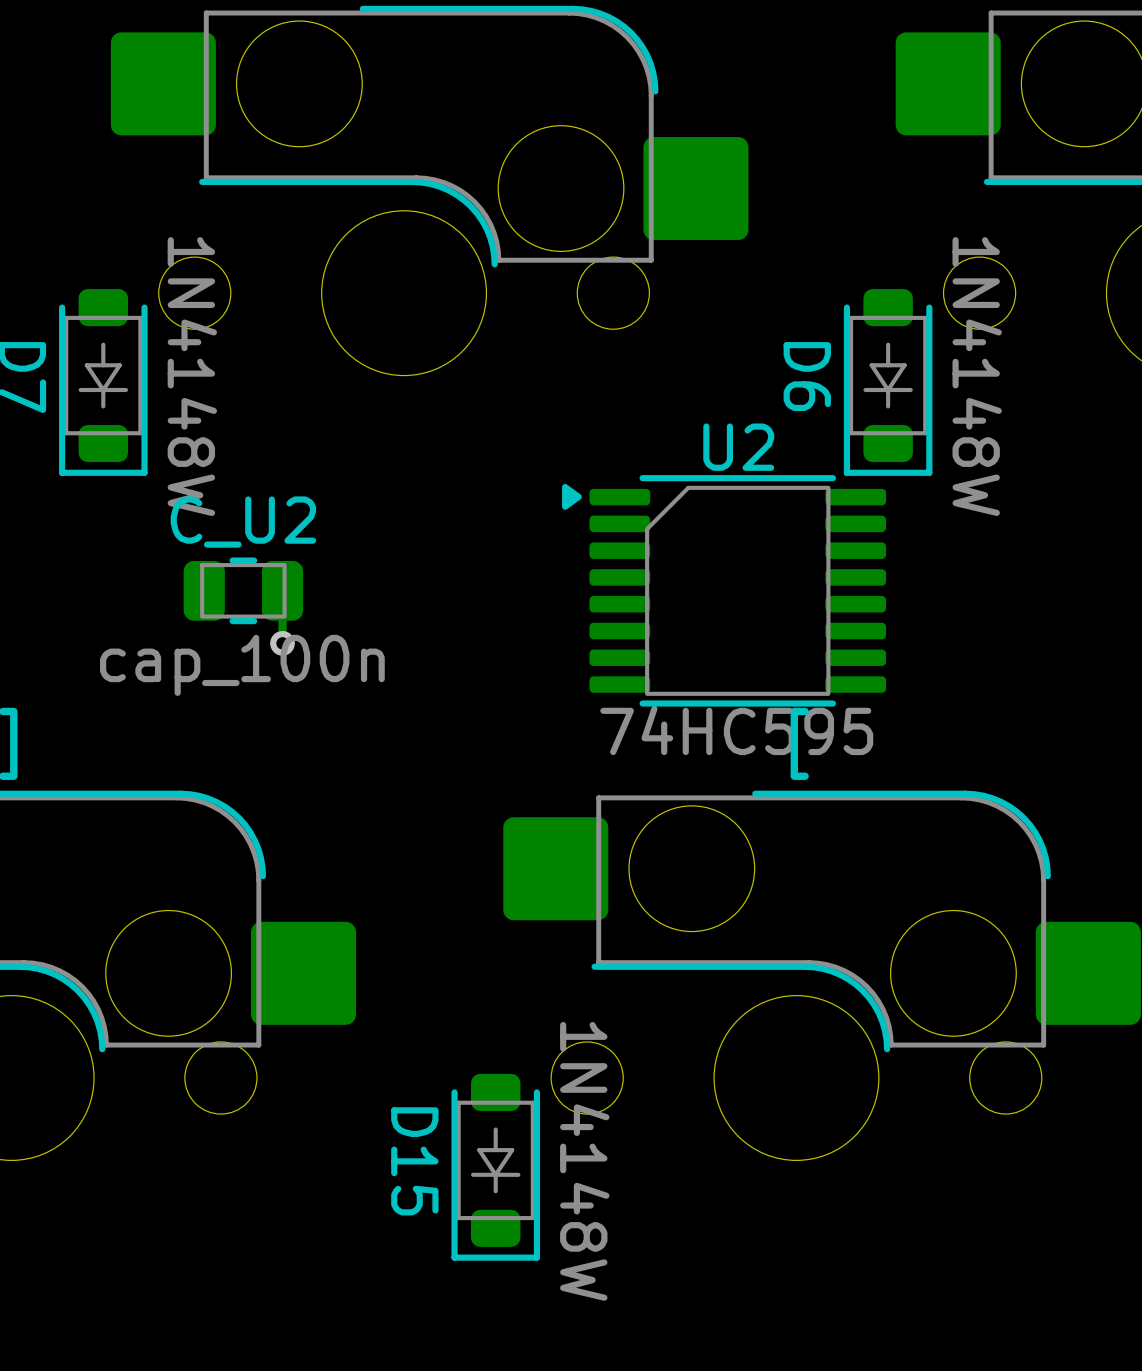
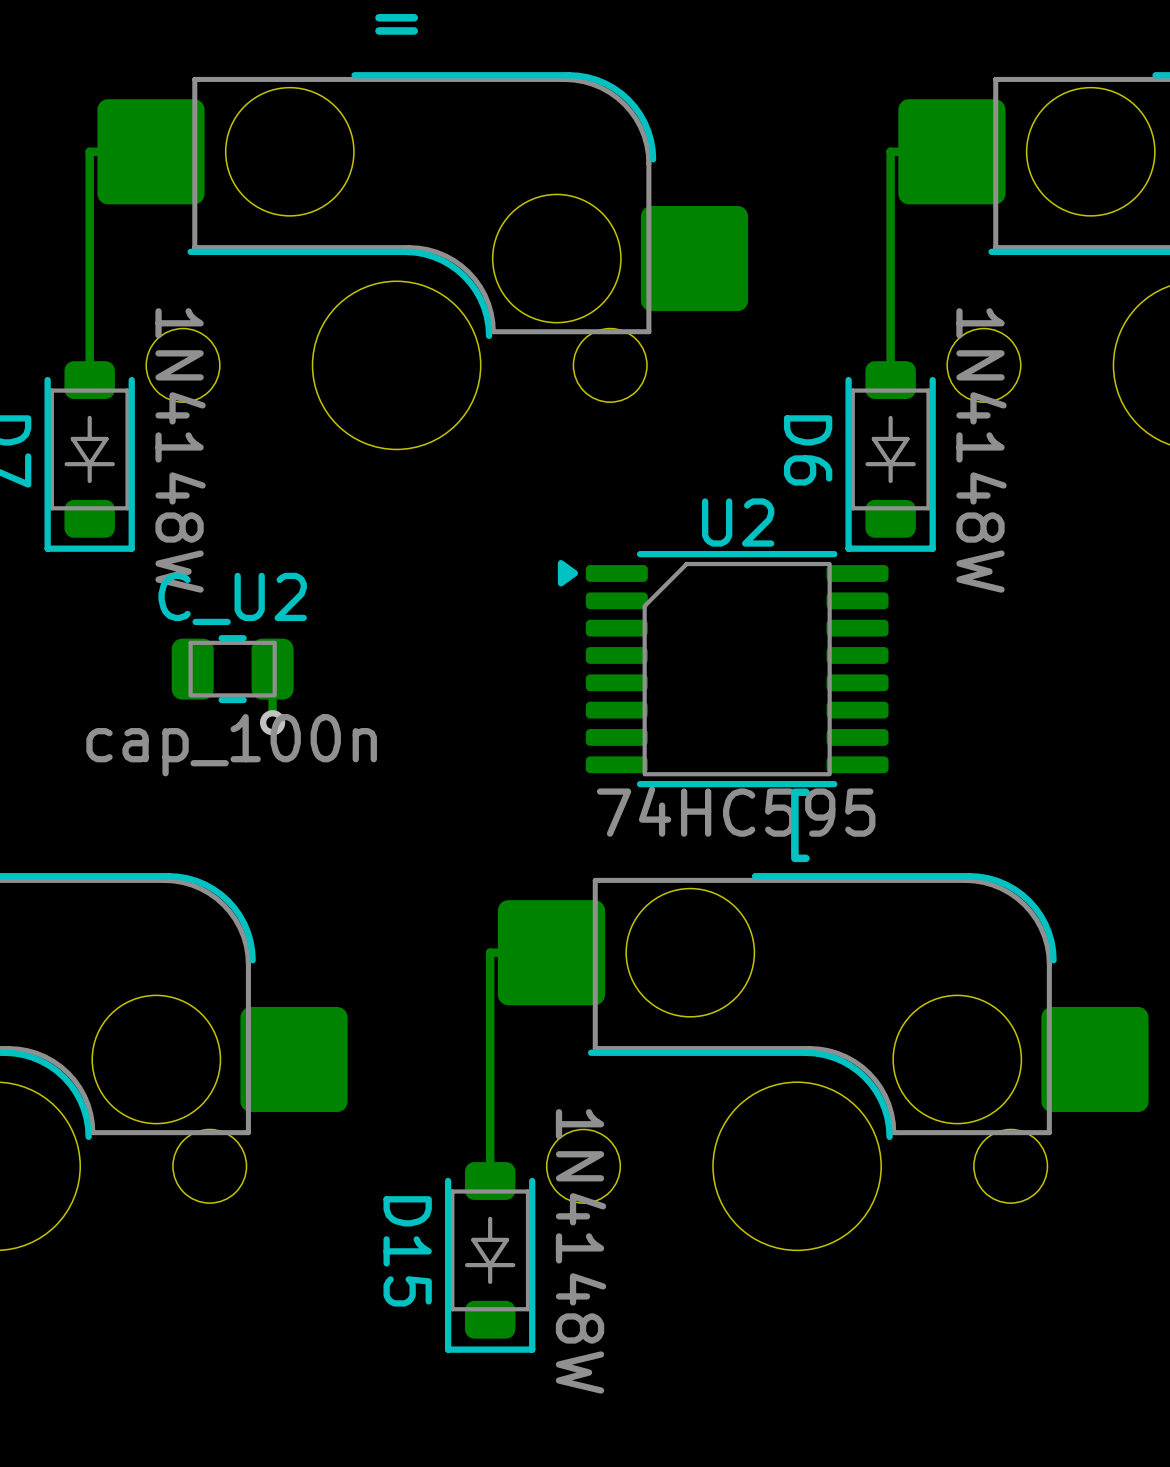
bottom track: none -> (150, 151) (89, 151) (89, 380)
bottom track: none -> (951, 151) (890, 151) (890, 380)
bottom track: none -> (551, 952) (490, 952) (490, 1181)

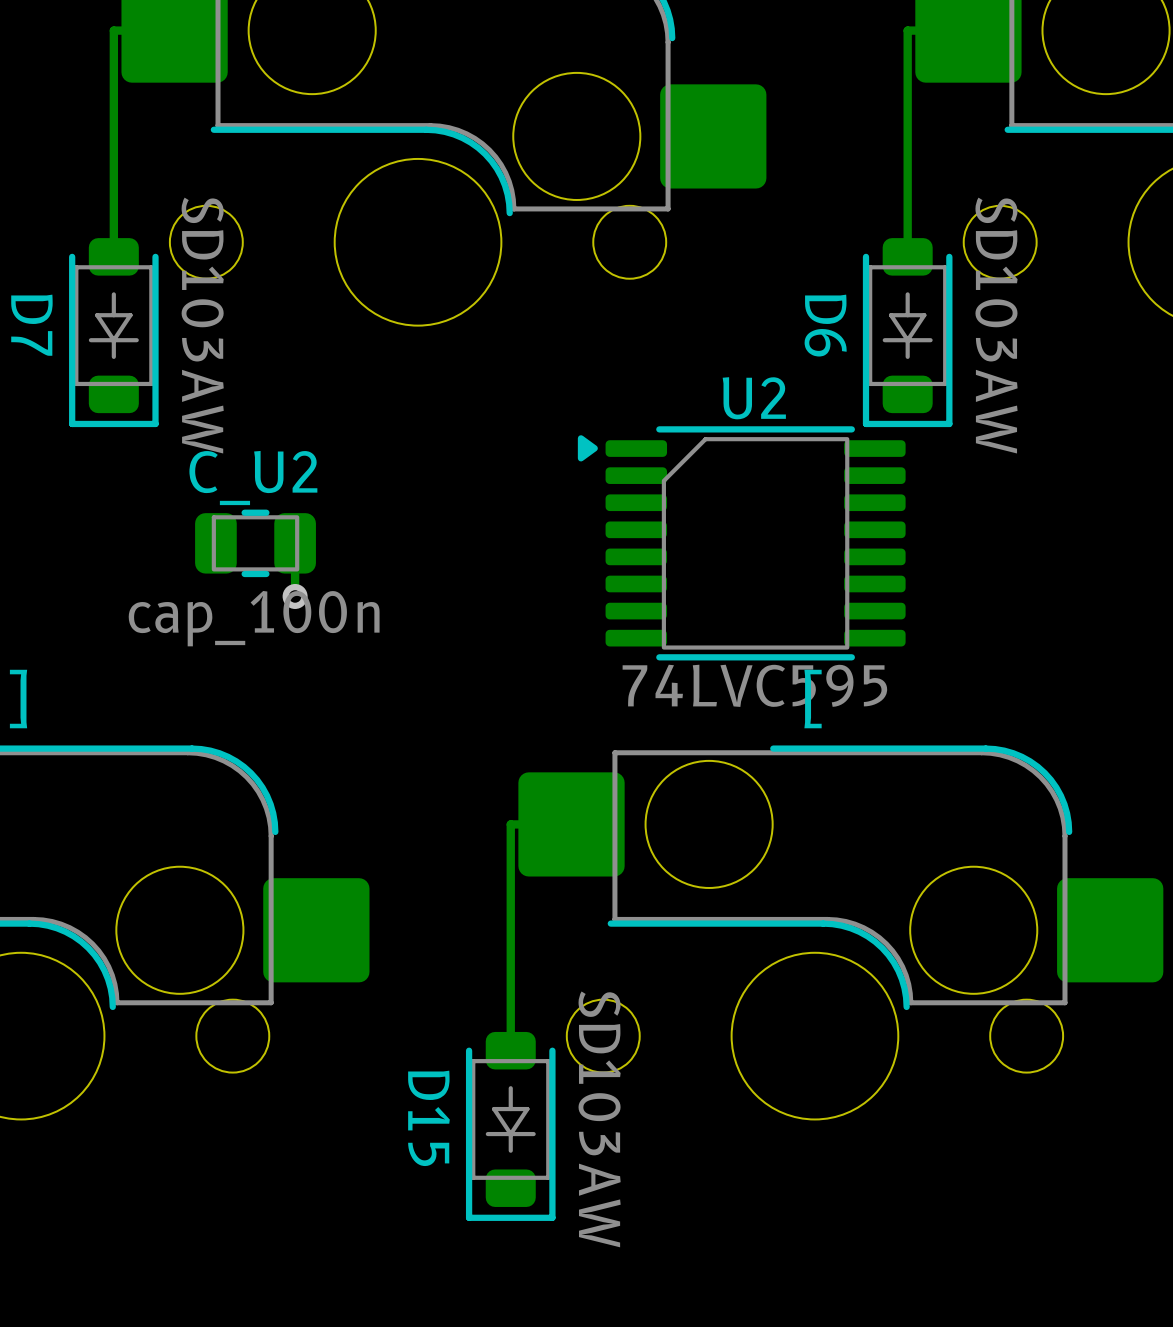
D7 value: 1N4148W (180, 450) -> SD103AW (202, 325)
D6 value: 1N4148W (981, 450) -> SD103AW (996, 325)
U2 value: 74HC595 (736, 811) -> 74LVC595 (754, 685)
D15 value: 1N4148W (581, 1251) -> SD103AW (599, 1119)

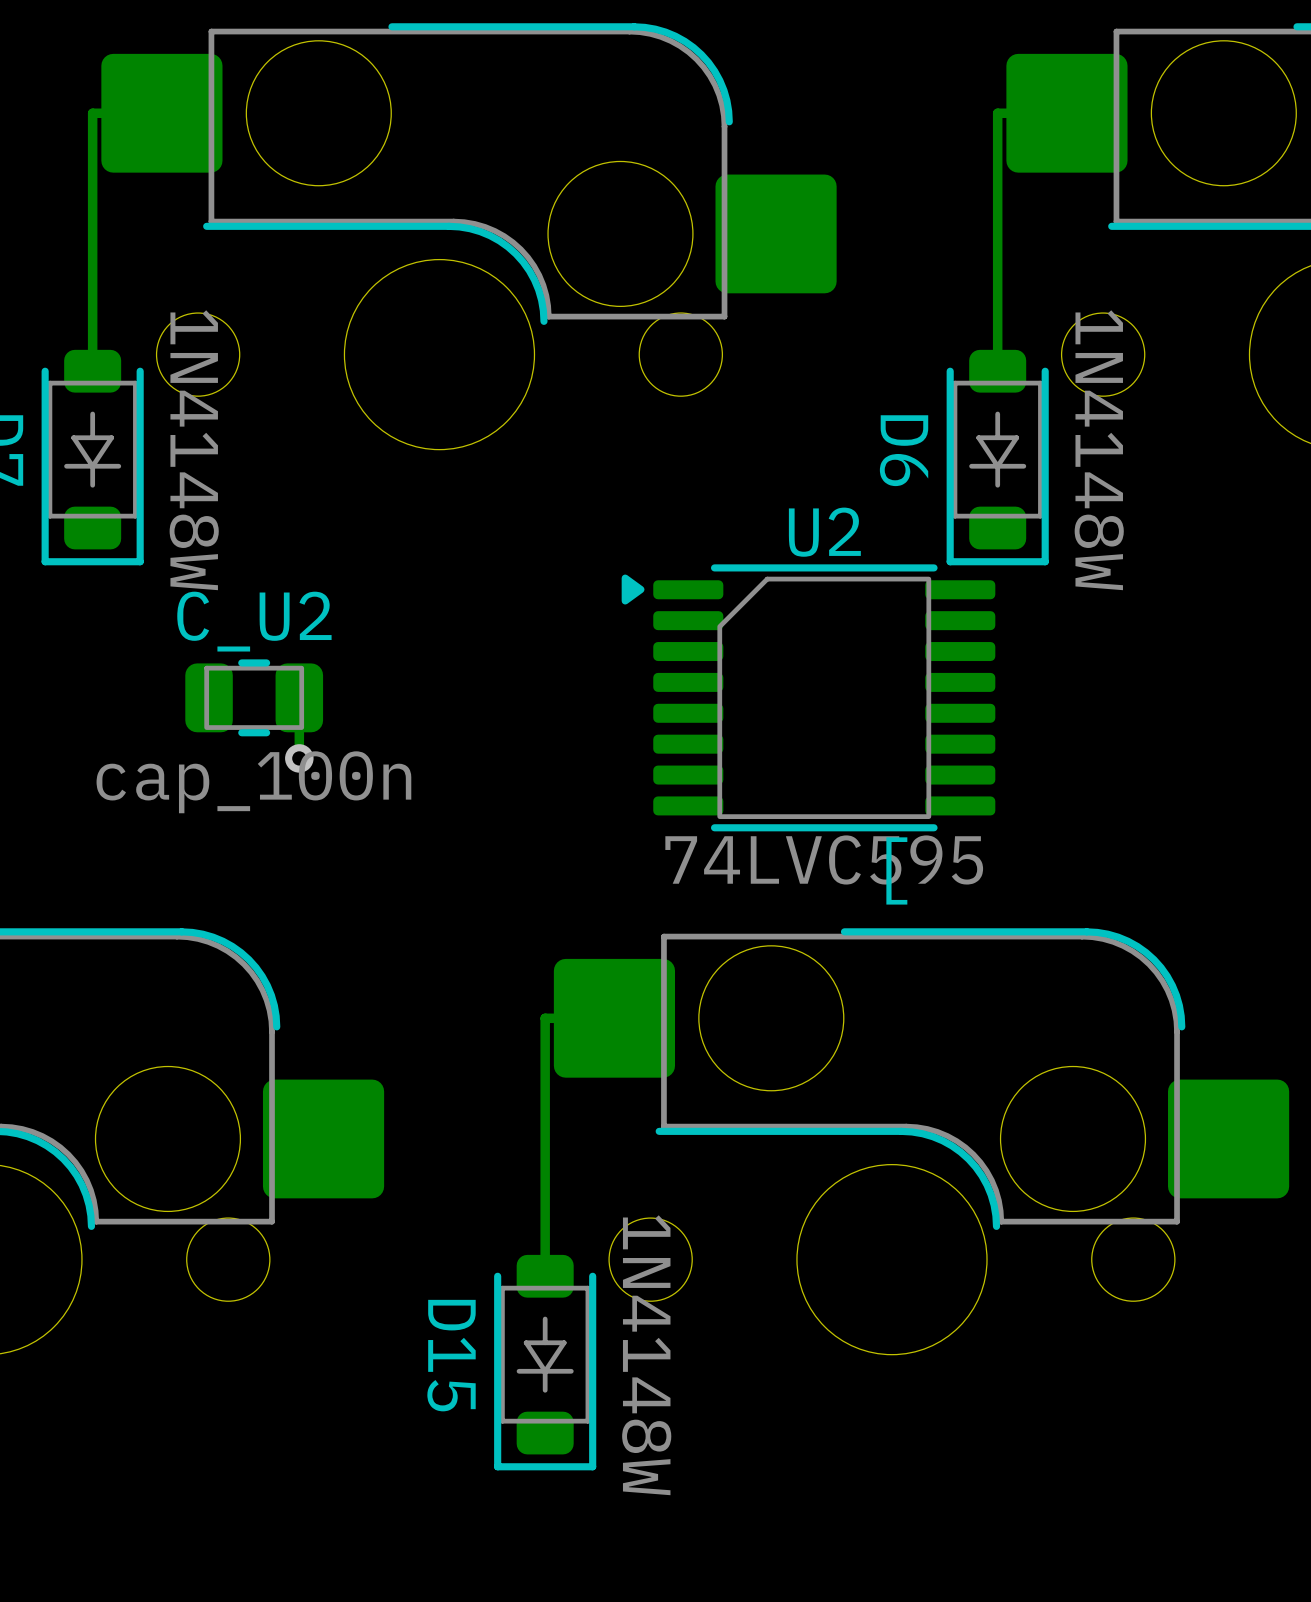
D7 value: SD103AW (202, 325) -> 1N4148W (194, 450)
D6 value: SD103AW (996, 325) -> 1N4148W (1099, 450)
D15 value: SD103AW (599, 1119) -> 1N4148W (646, 1355)

